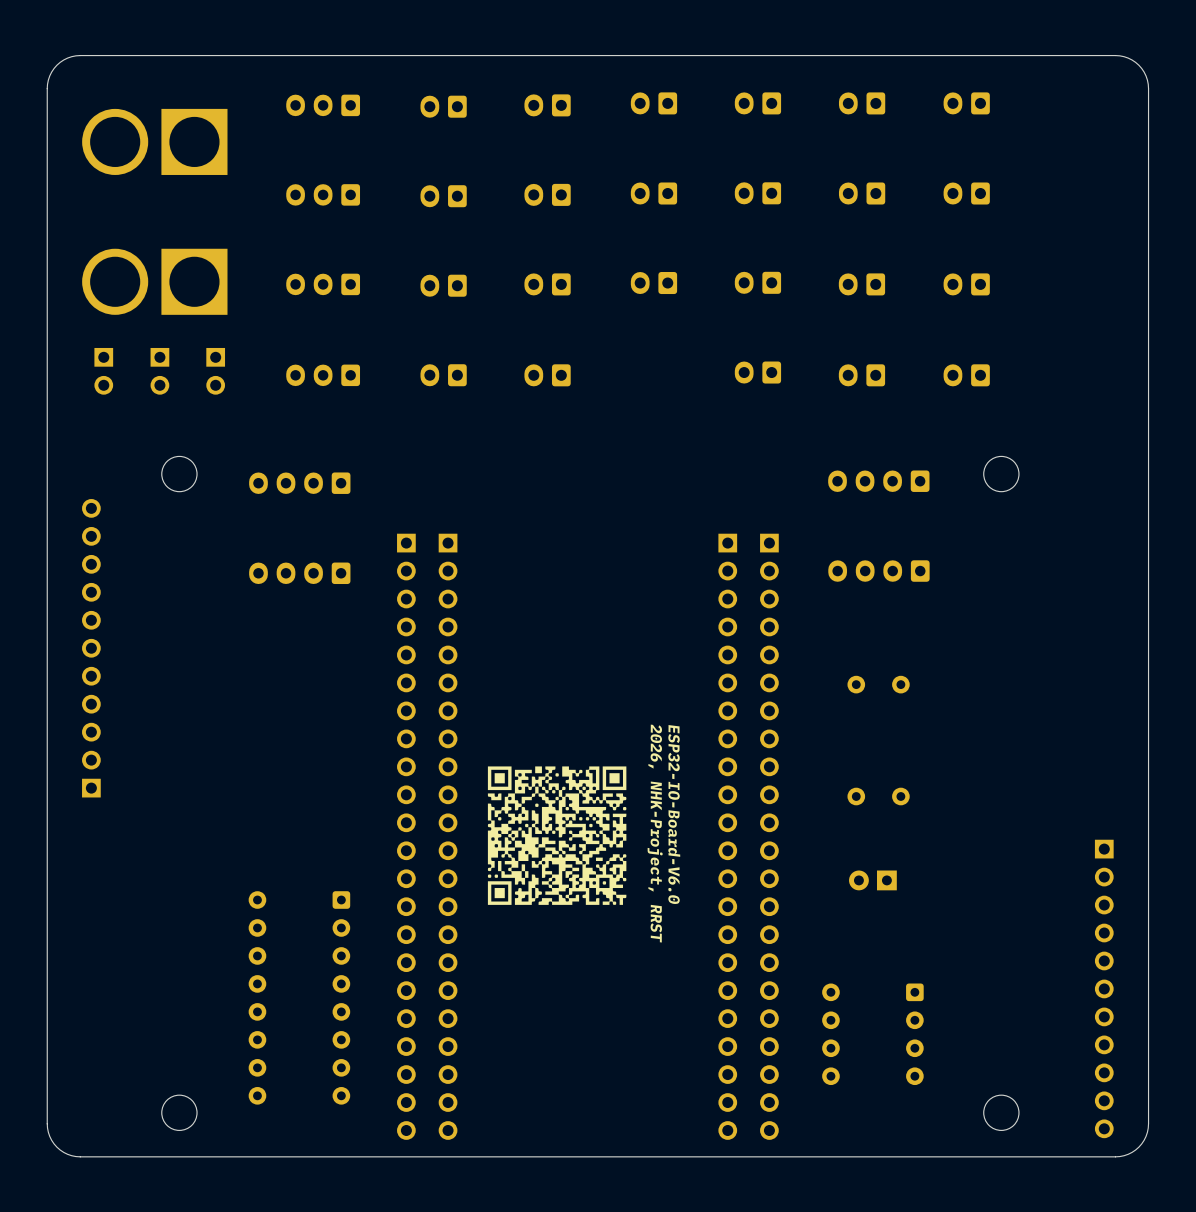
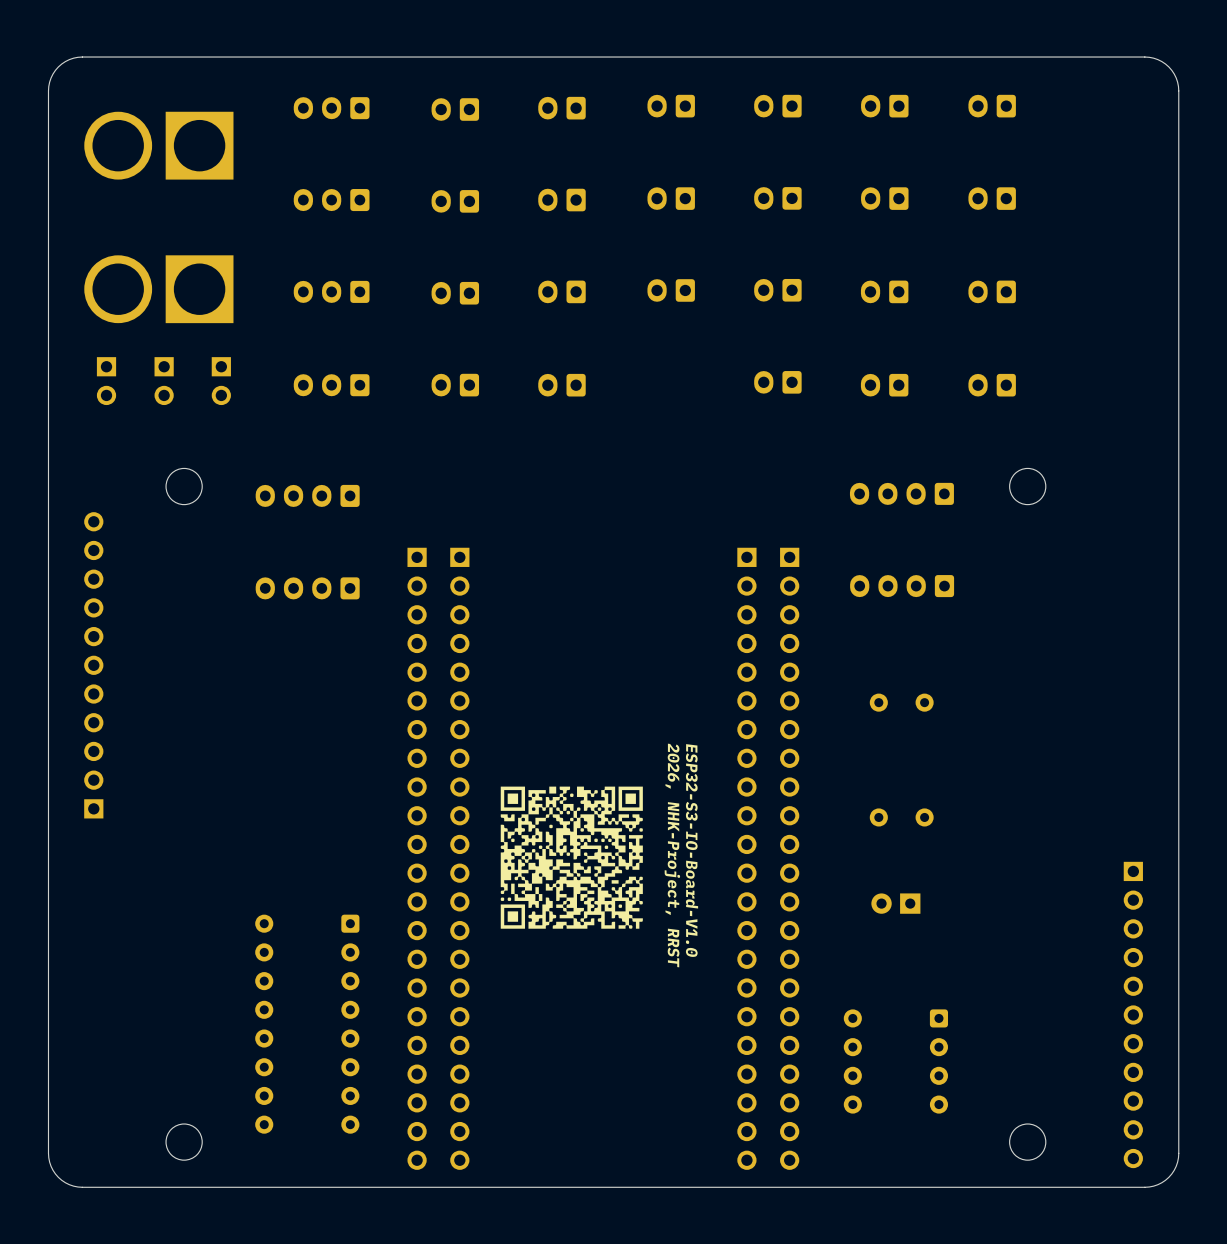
text: ESP32-IO-Board-V6.0 (674, 814) -> ESP32-S3-IO-Board-V1.0 (692, 850)

